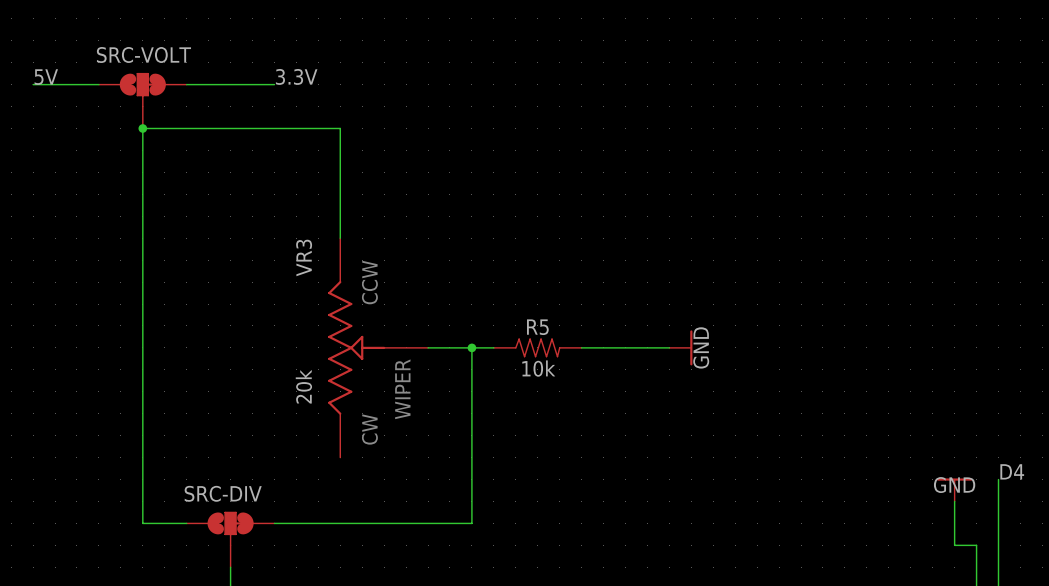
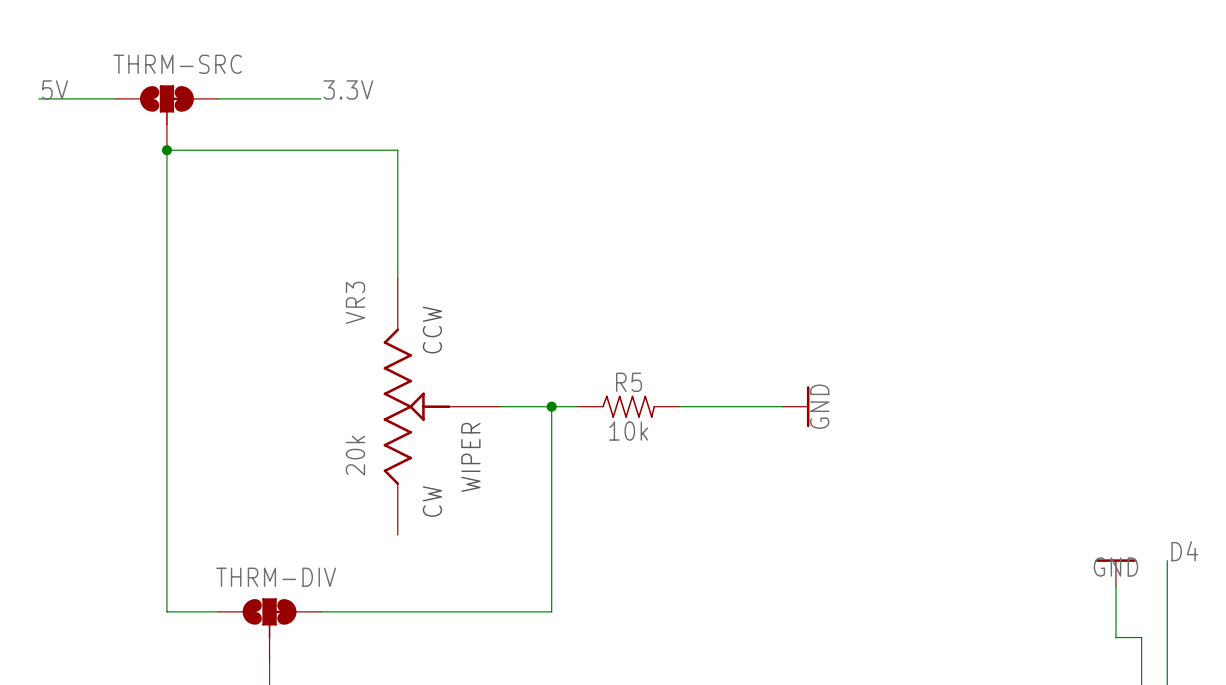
SRC-VOLT name: SRC-VOLT (143, 55) -> THRM-SRC (177, 64)
SRC-DIV name: SRC-DIV (223, 493) -> THRM-DIV (276, 577)

